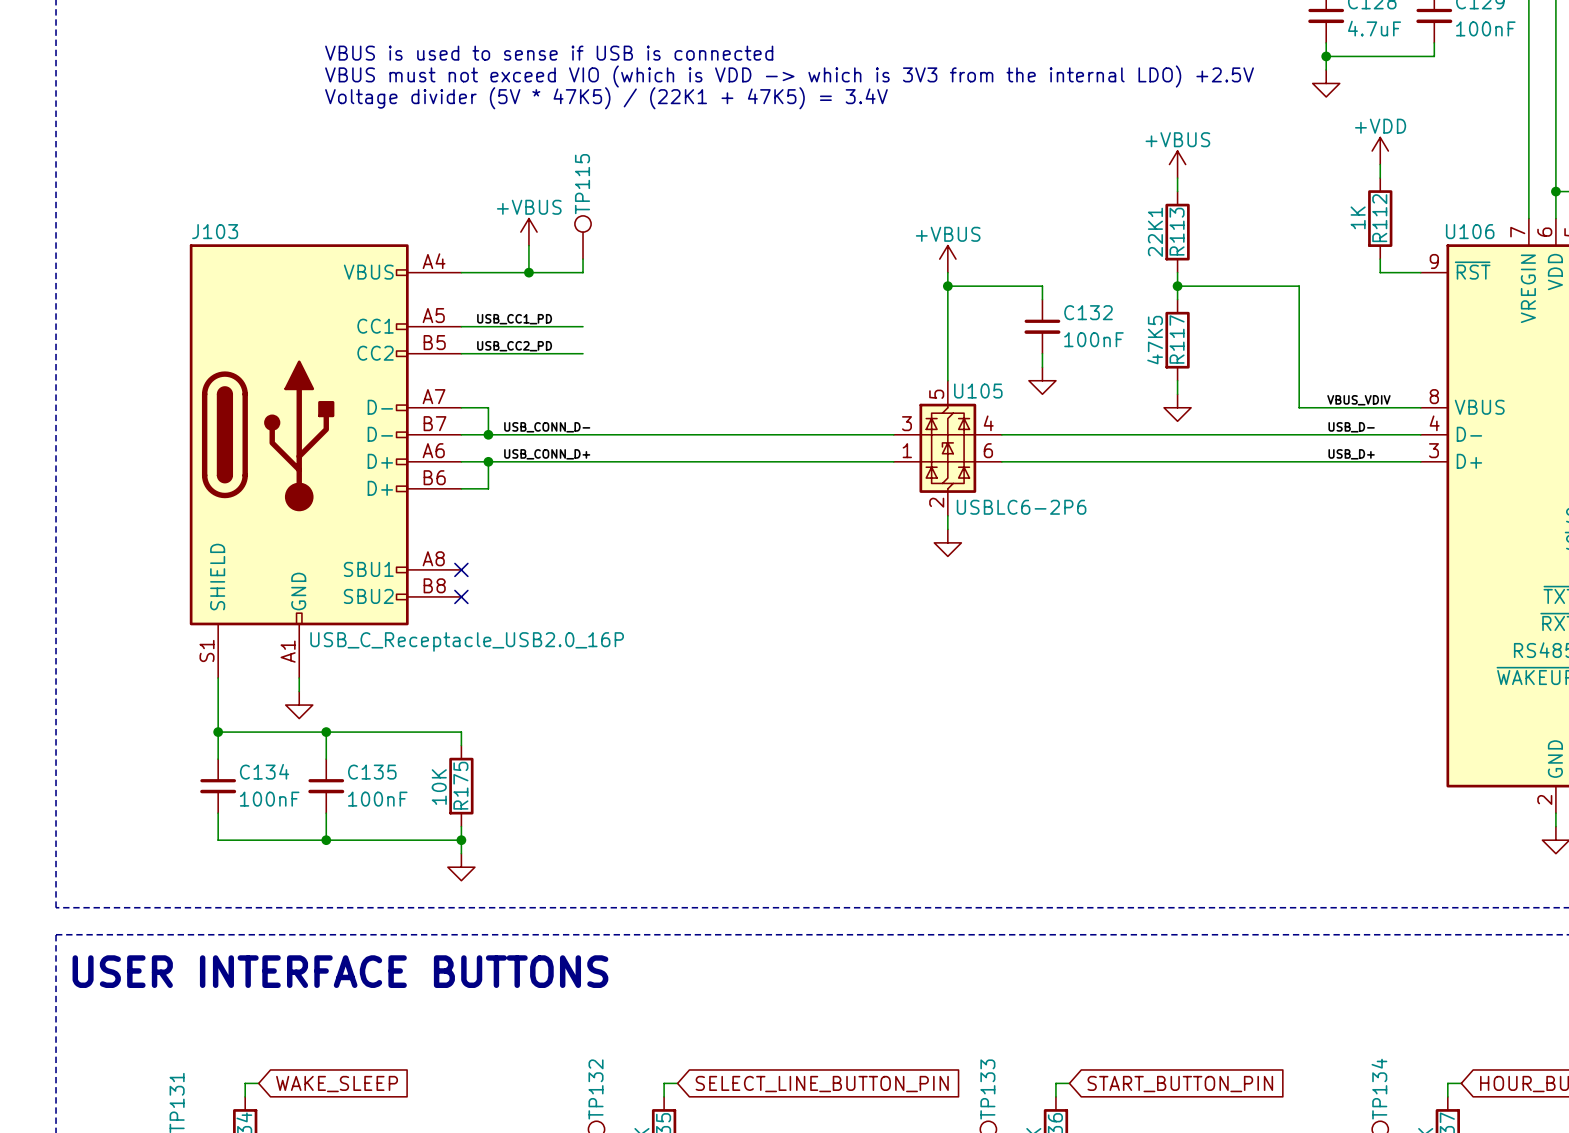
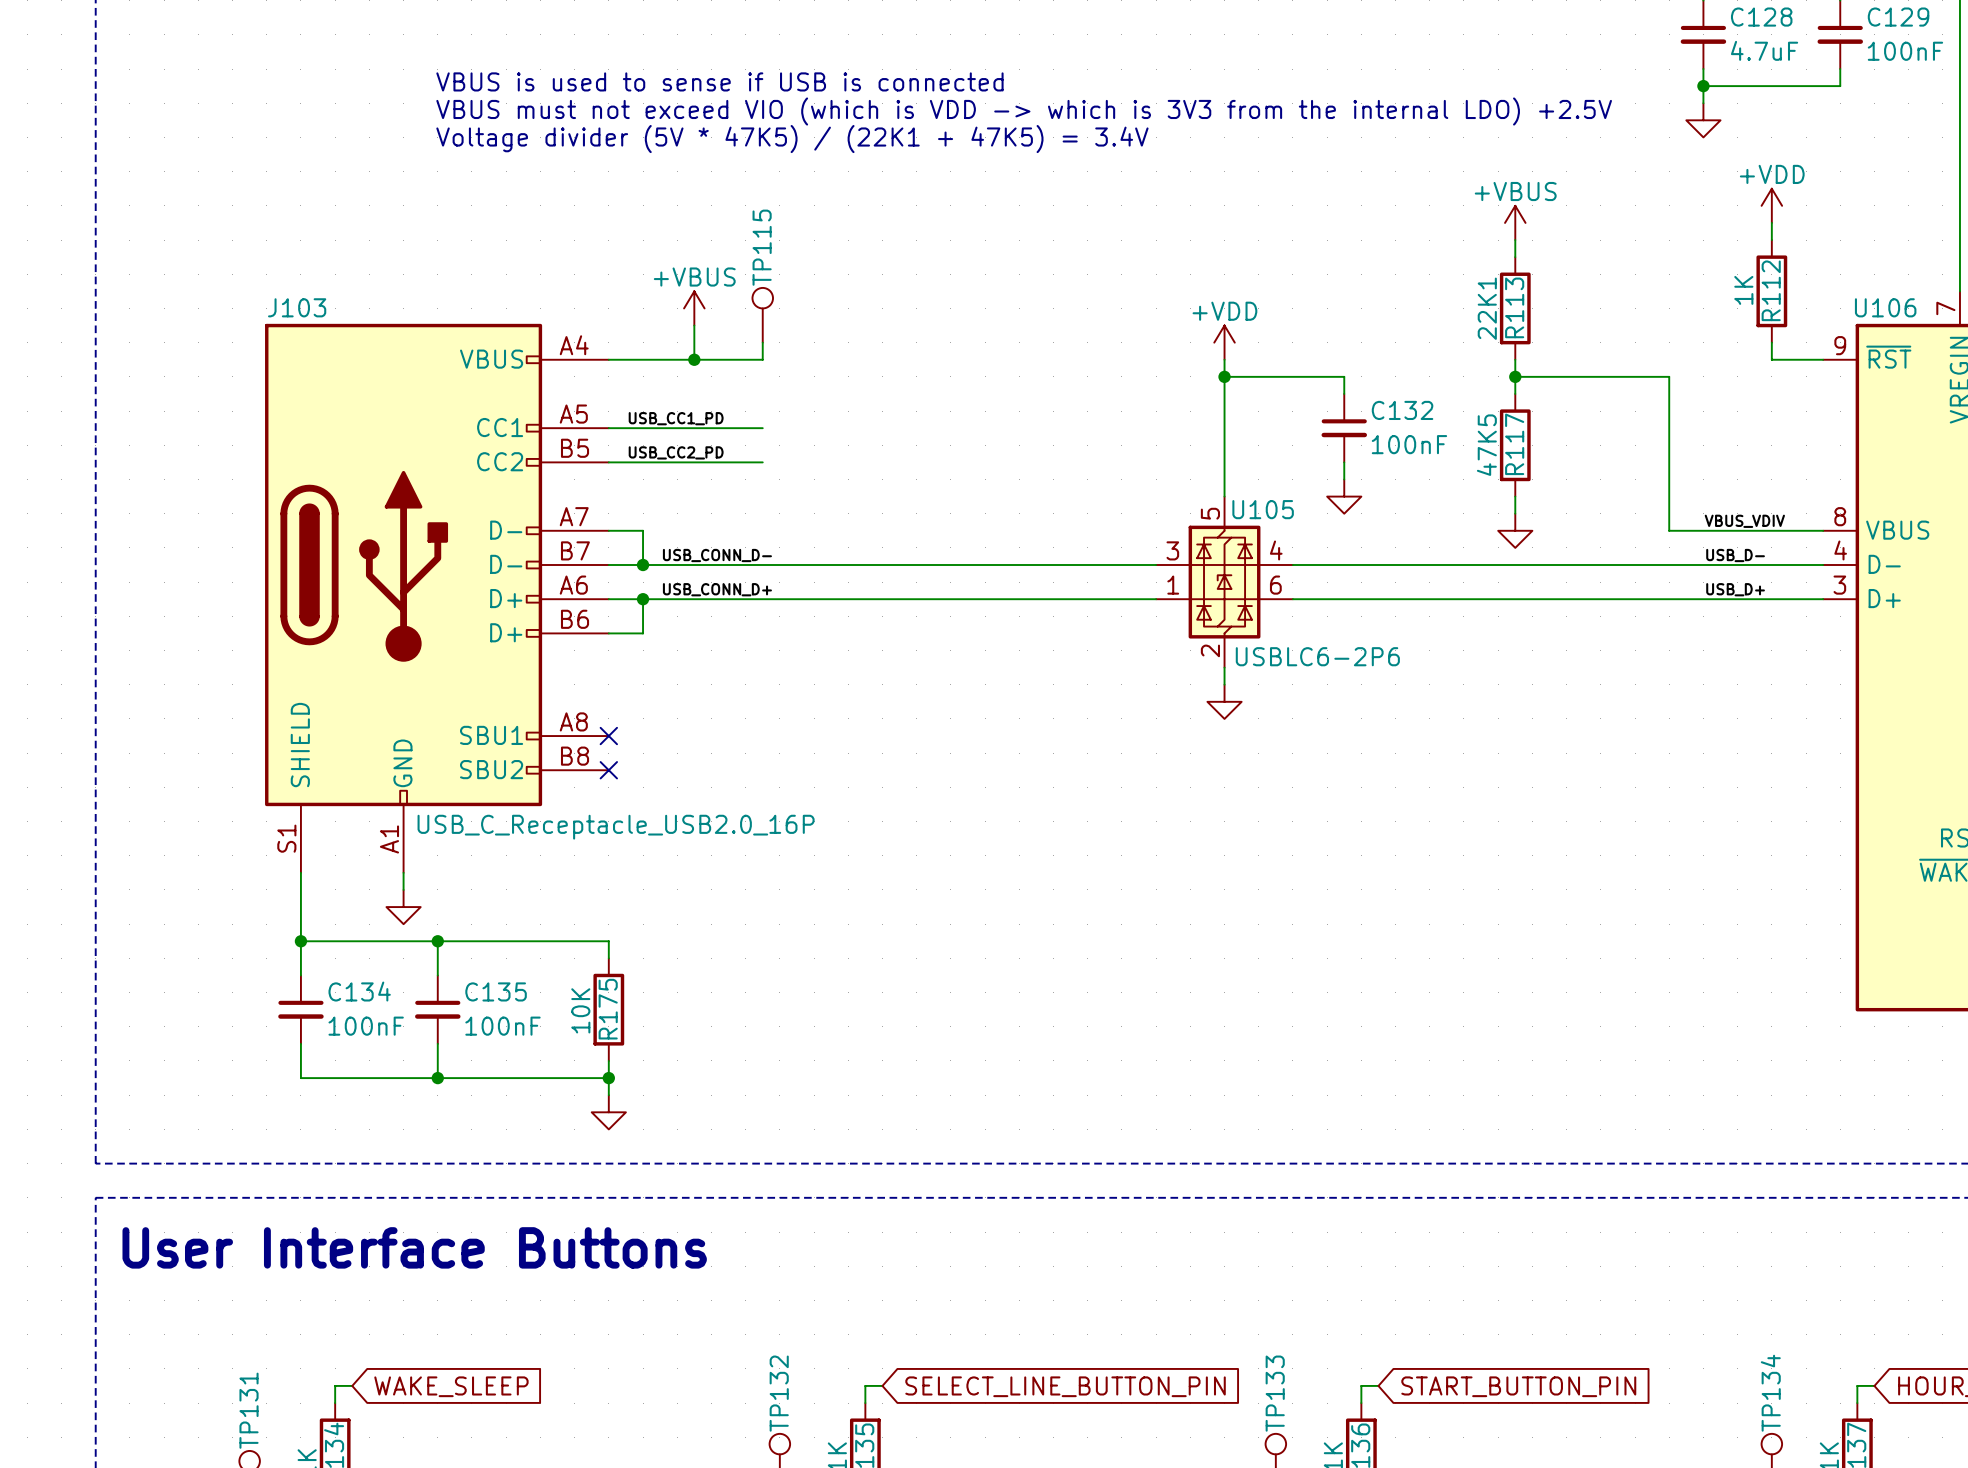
power symbol: +VBUS (947, 259) -> +VDD (1224, 342)
text: USER INTERFACE BUTTONS (340, 971) -> none
text: none -> User Interface Buttons (414, 1247)

